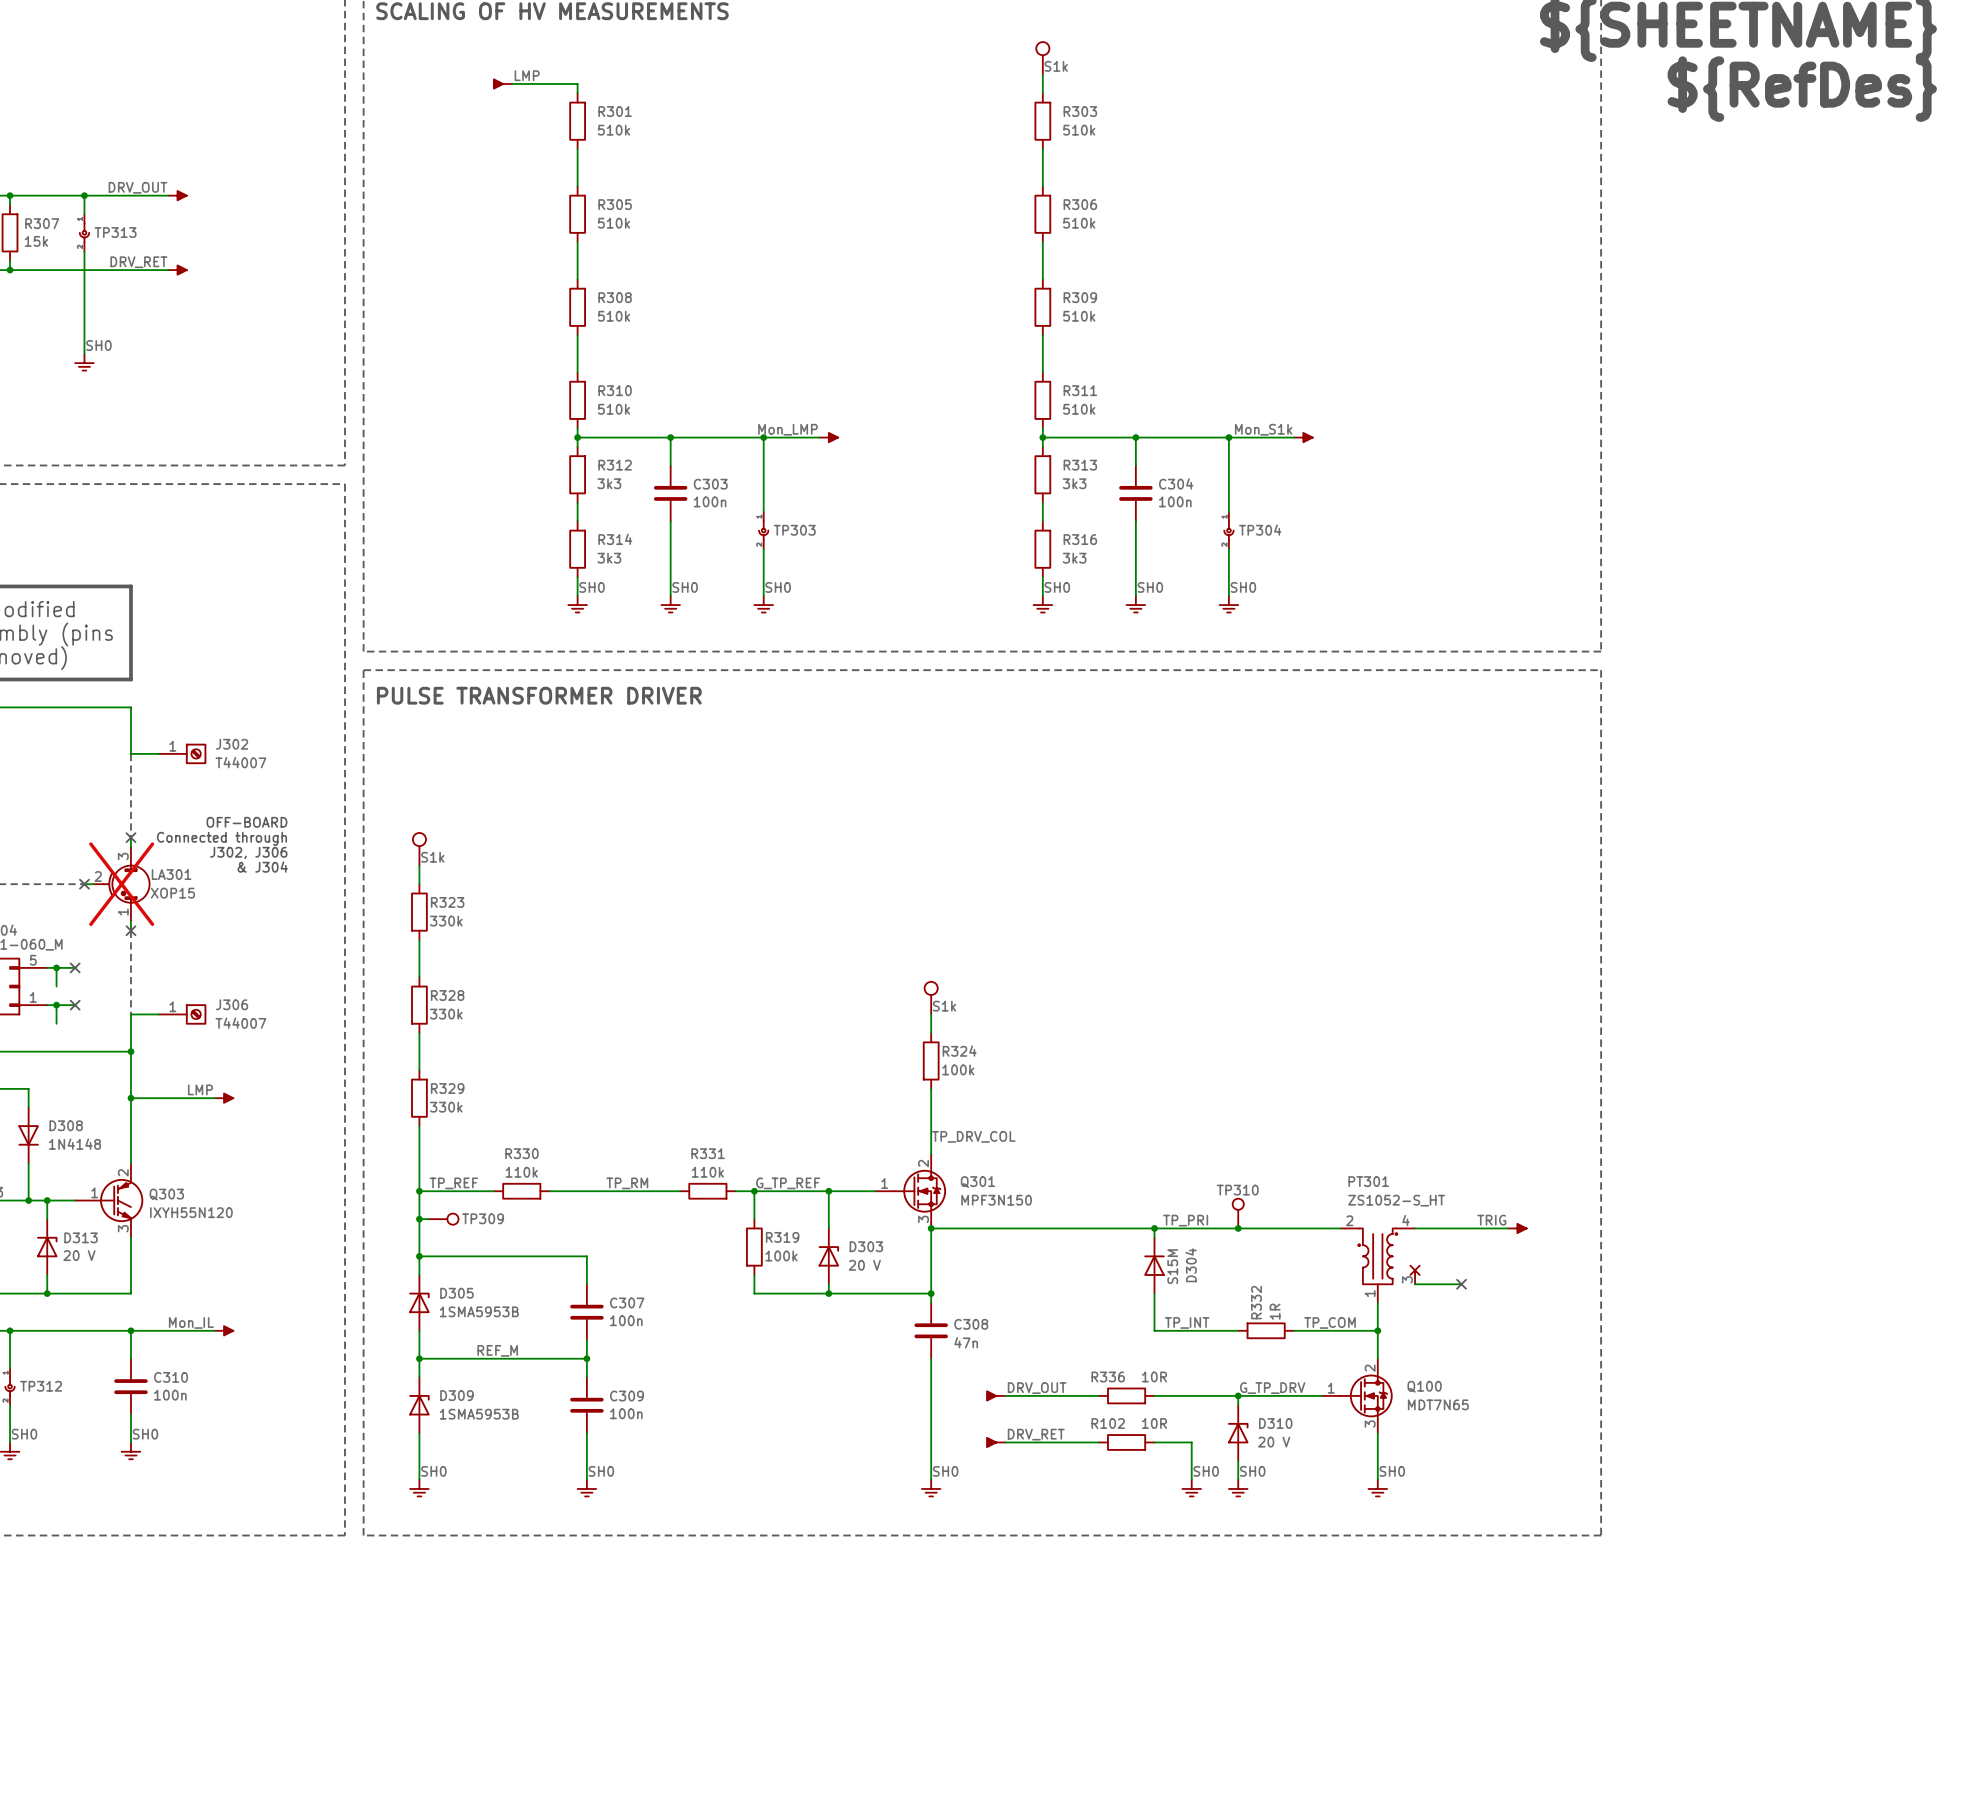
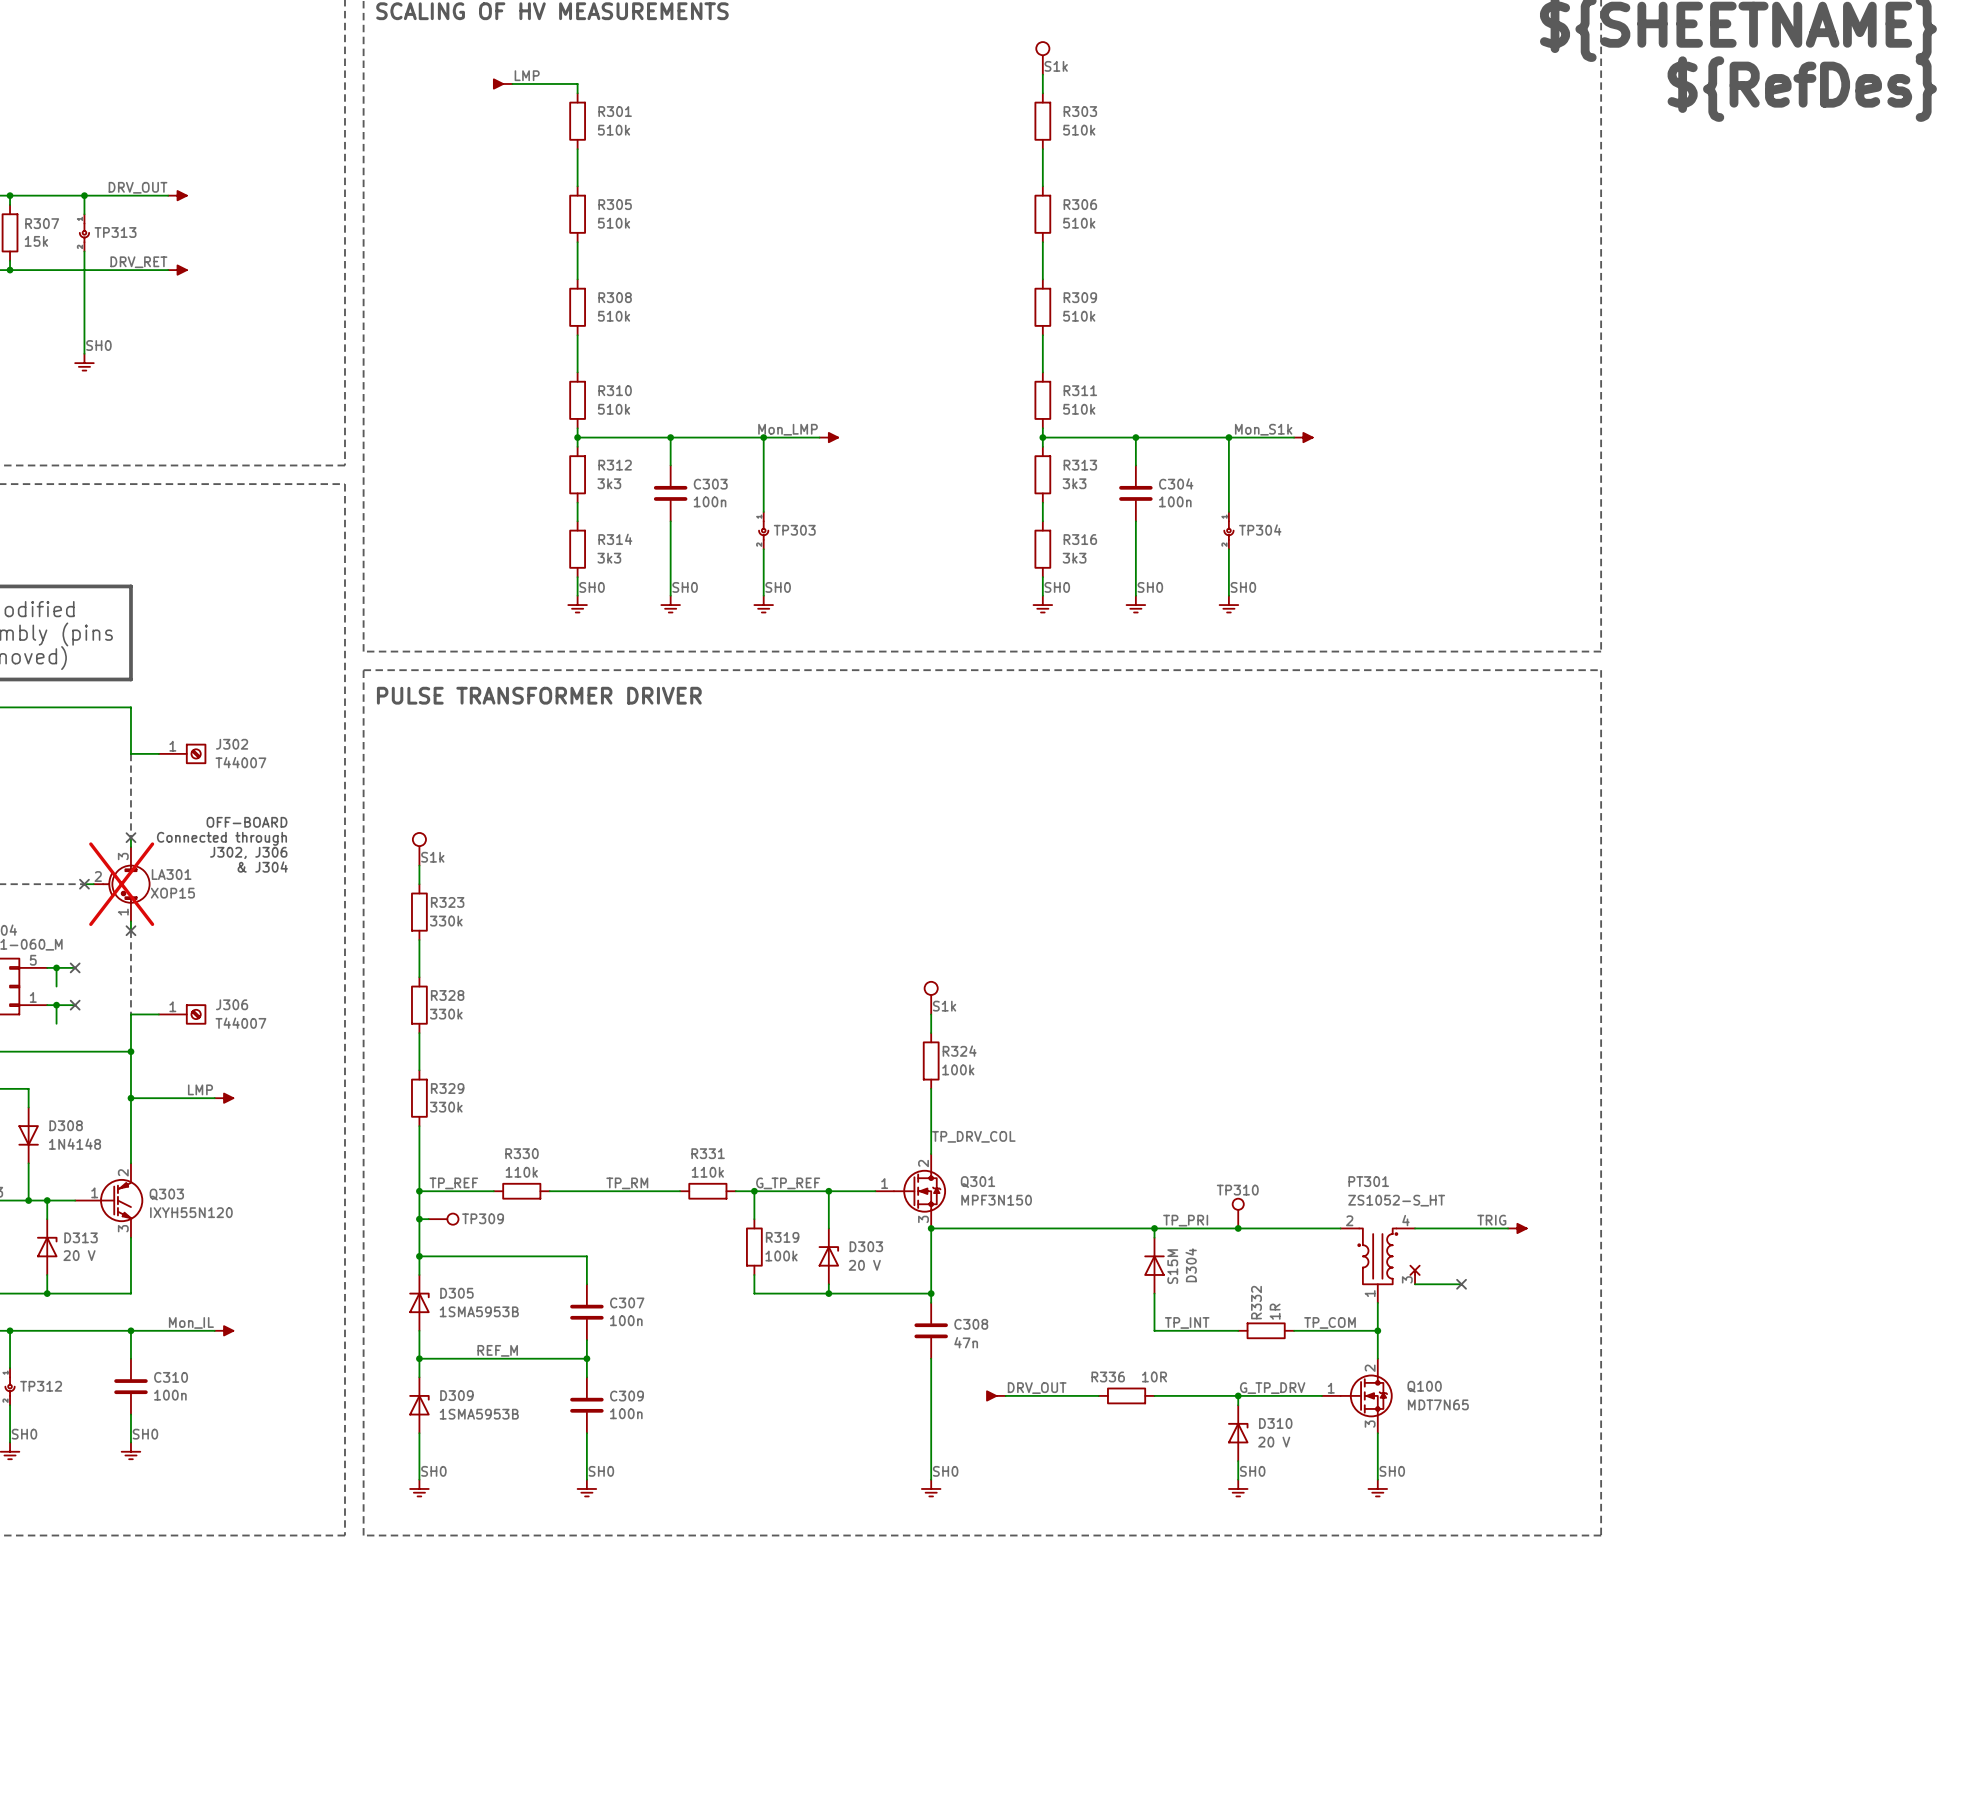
label: DRV_RET (1036, 1434) -> none
part: (996, 1442) -> none
wire: (1005, 1442) (1098, 1442) -> none
R102: 10R (1126, 1442) -> none
wire: (1154, 1442) (1191, 1442) (1191, 1479) -> none
label: SH0 (1206, 1471) -> none
part: (1191, 1488) -> none

